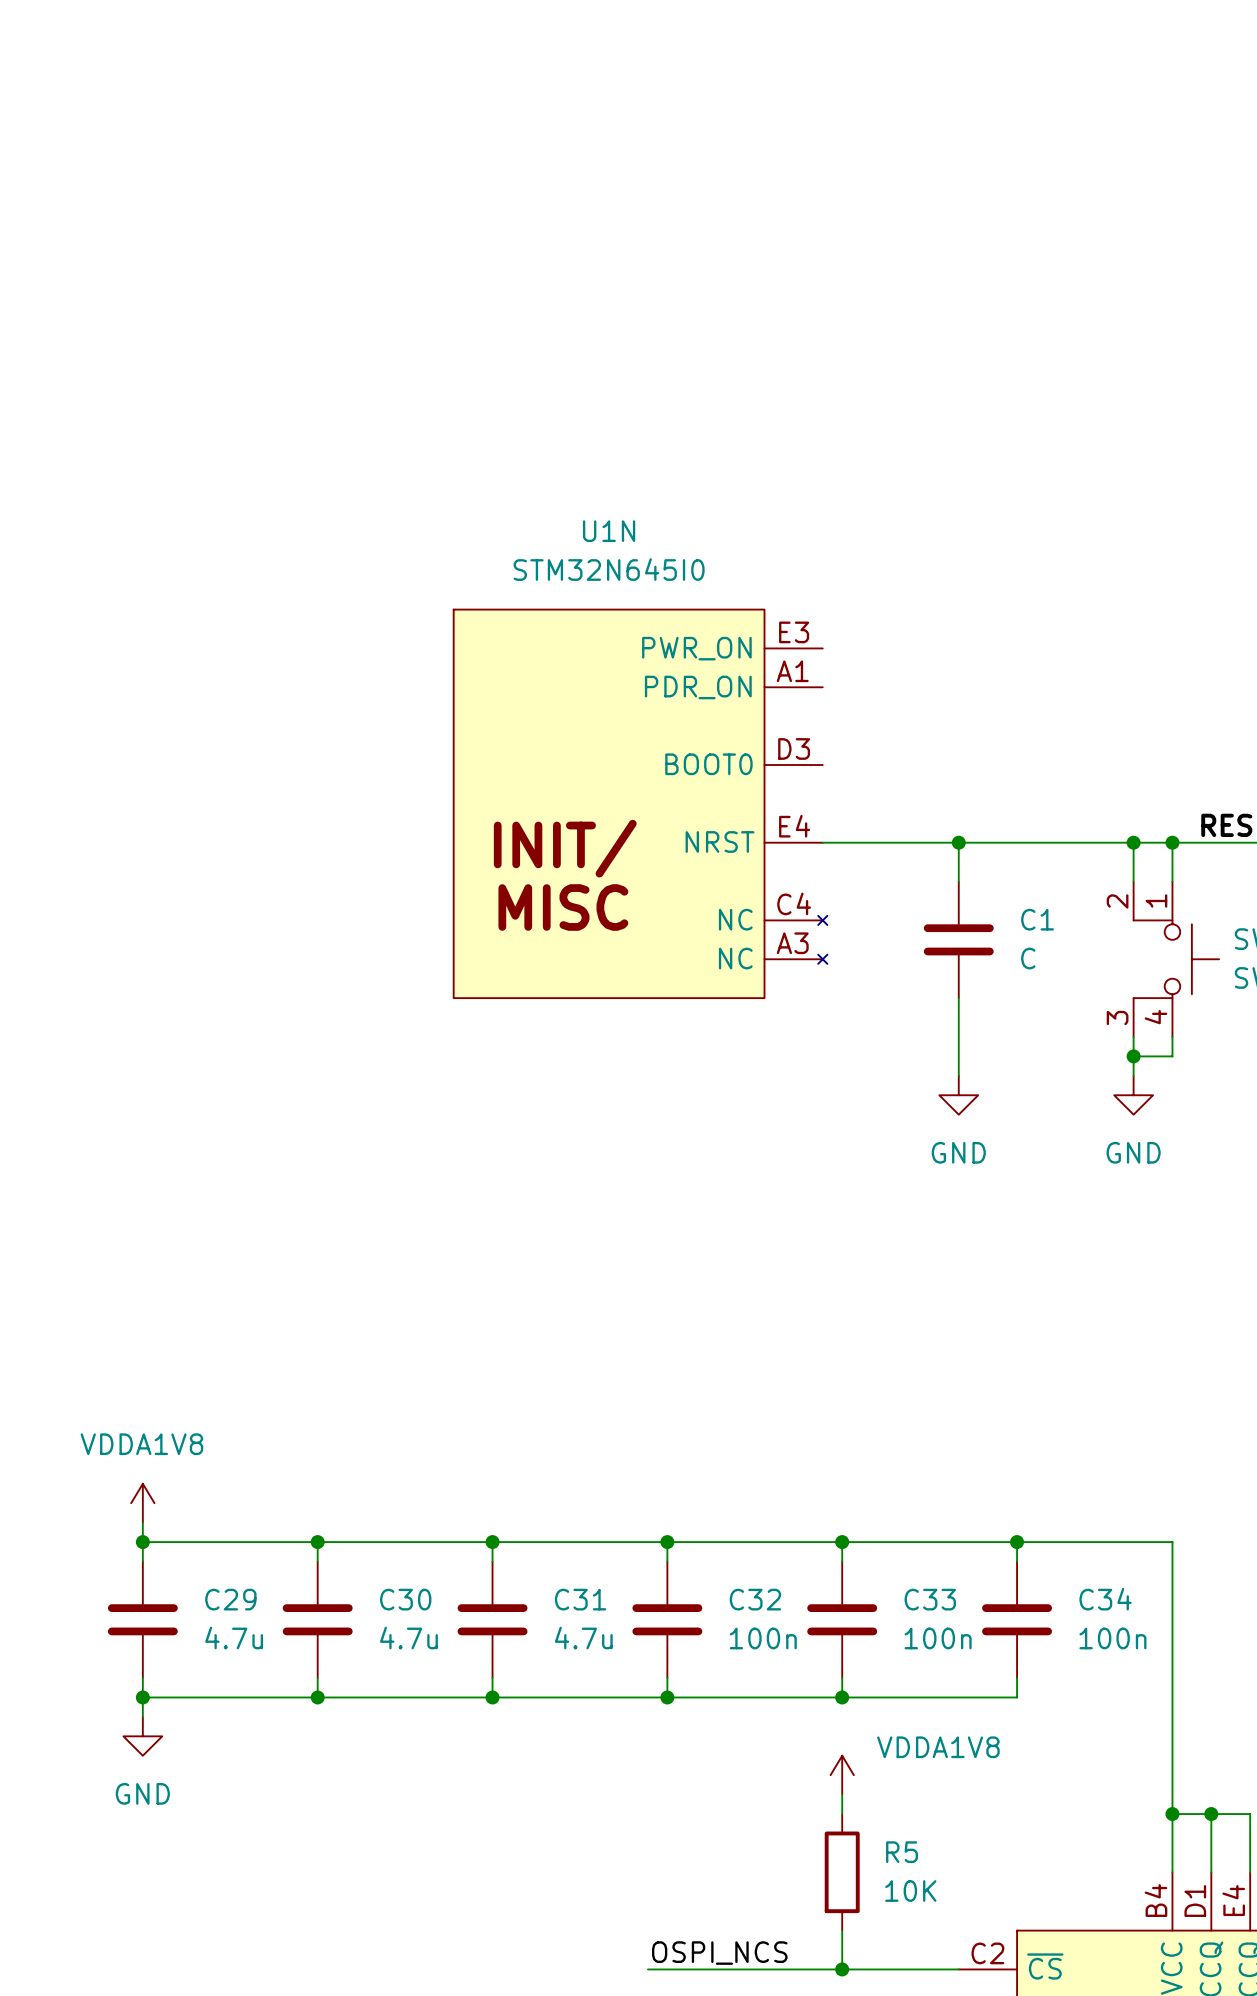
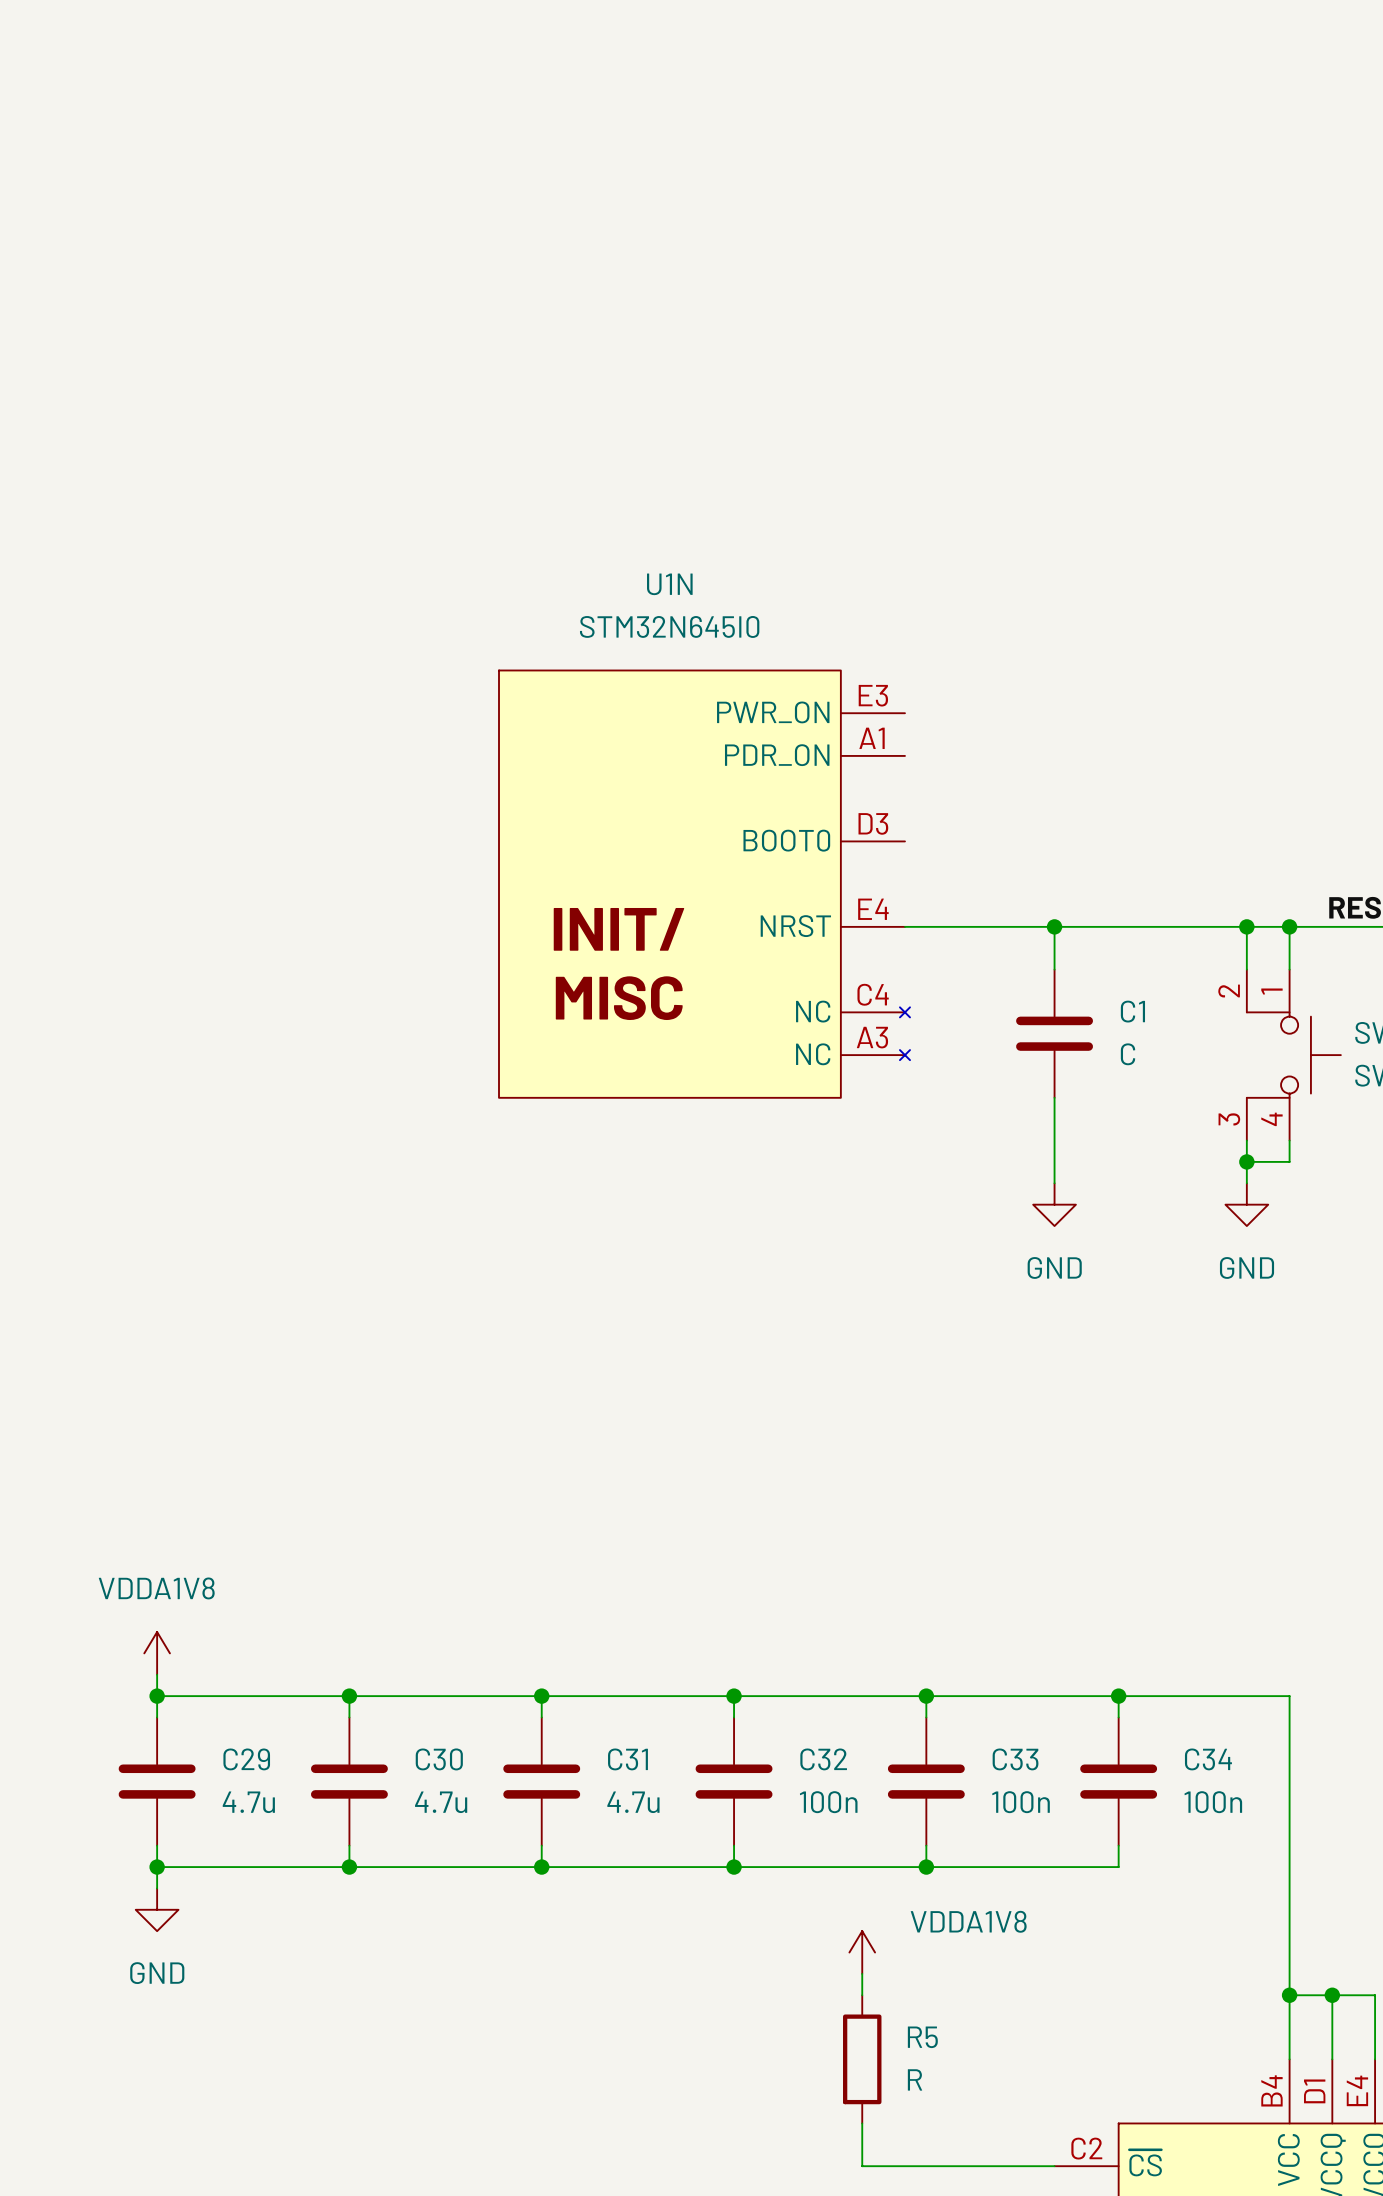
power symbol position: VDDA1V8 (842, 1775) -> VDDA1V8 (862, 1952)
wire: (842, 1794) (842, 1814) -> (862, 1973) (862, 1995)
R5 position: (842, 1872) -> (862, 2059)
R5 value: 10K (910, 1891) -> R (915, 2079)
wire: (842, 1930) (842, 1969) -> none
label: OSPI_NCS (719, 1953) -> none
wire: (647, 1969) (783, 1969) -> (862, 2123) (862, 2166)
junction: (842, 1969) -> none

